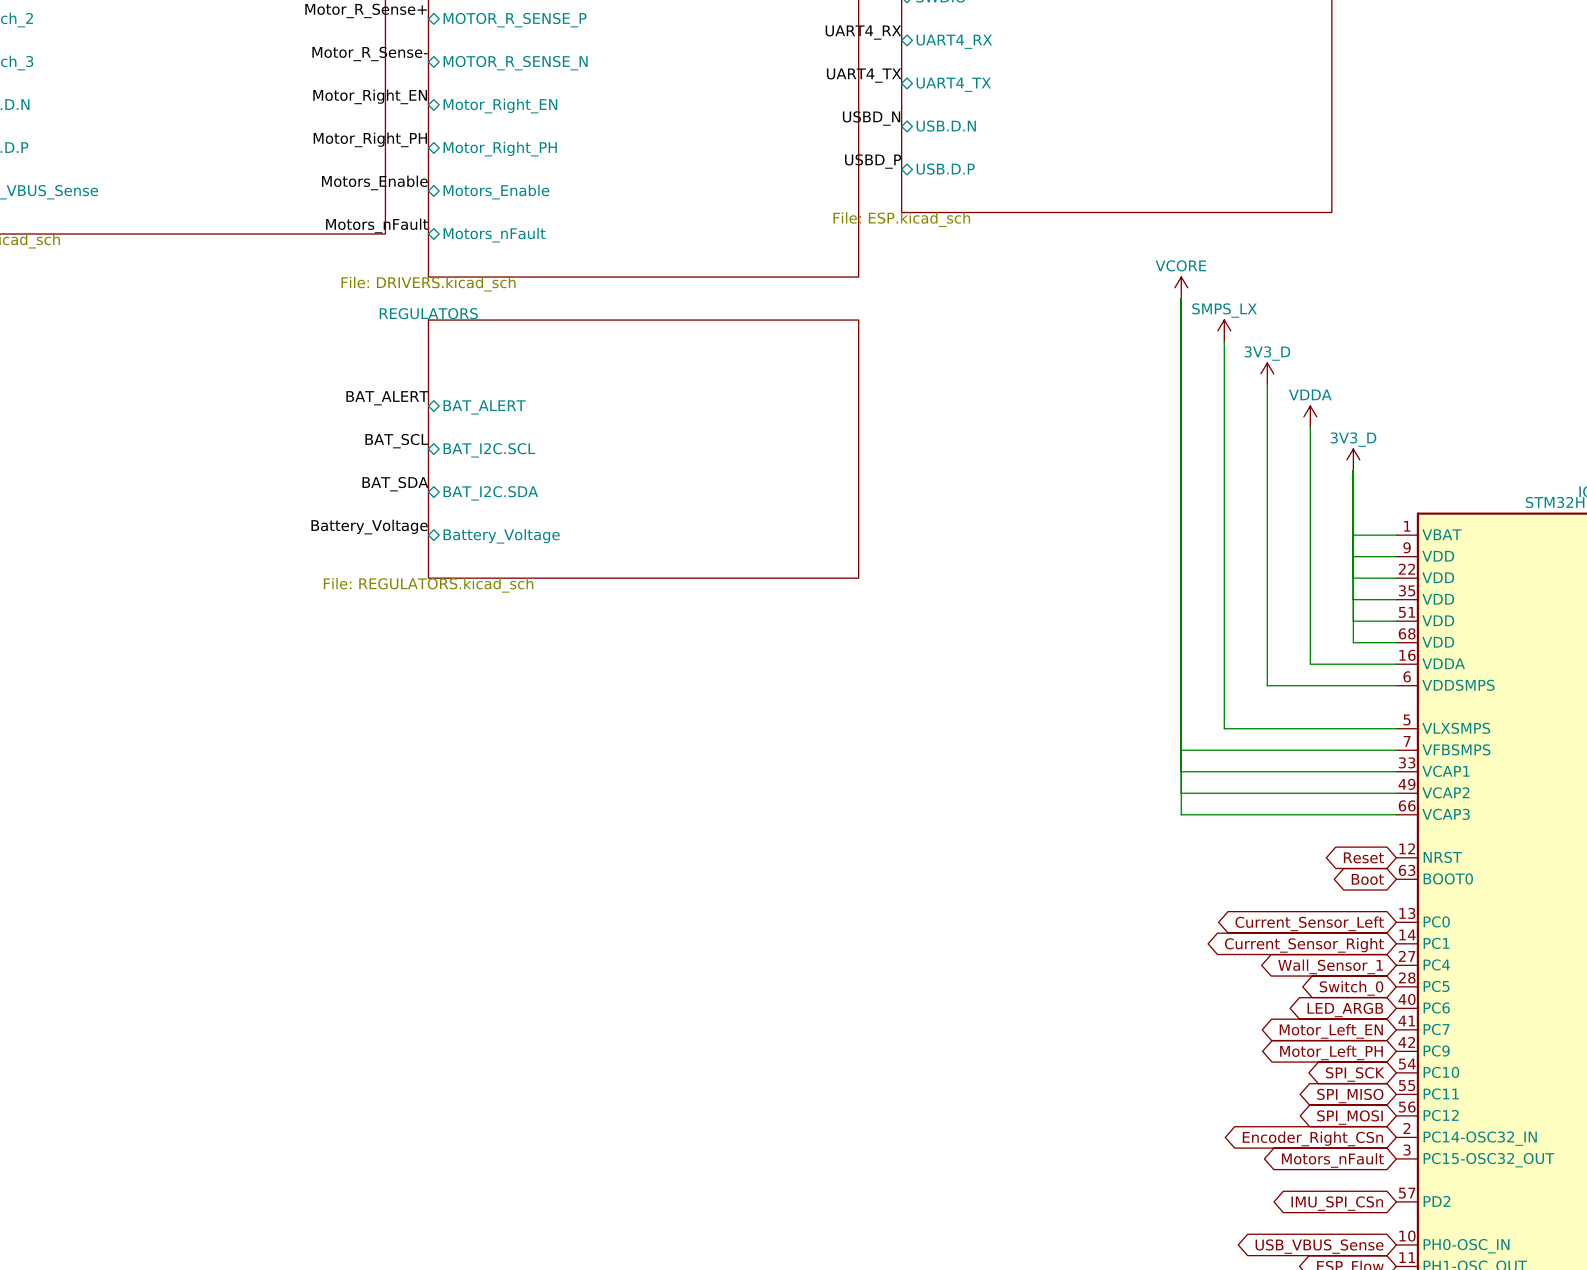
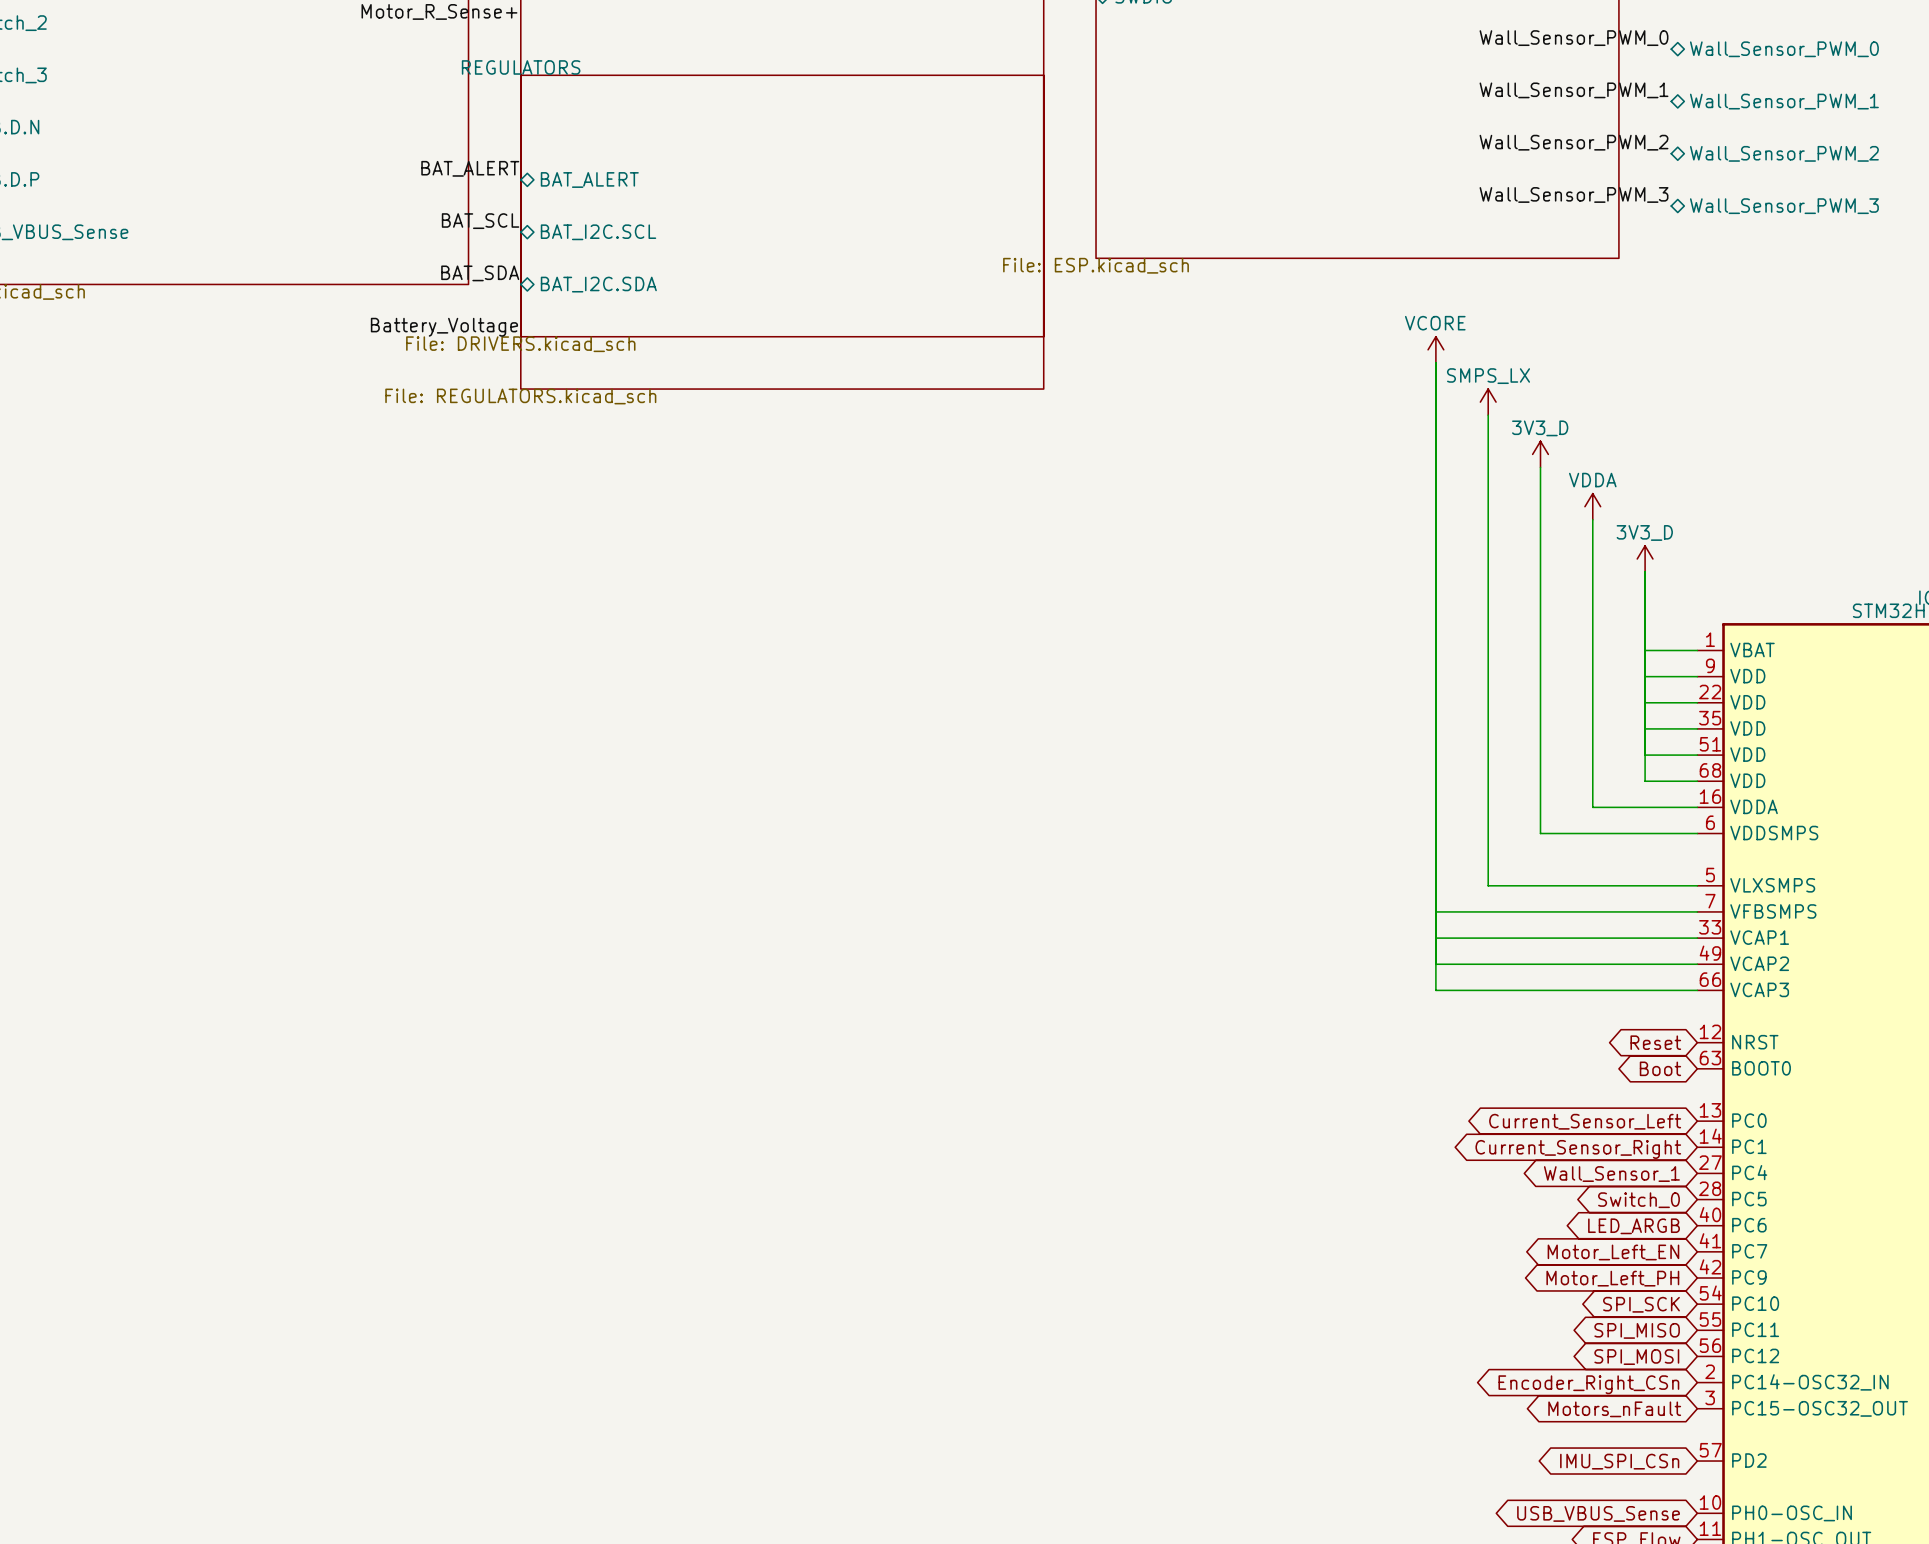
sheet pin: MOTOR_R_SENSE_P (515, 20) -> none
label: UART4_RX (863, 32) -> none
label: none -> Wall_Sensor_PWM_0 (1574, 38)
sheet pin: UART4_RX (954, 41) -> none
sheet pin: none -> Wall_Sensor_PWM_0 (1784, 49)
label: Motor_R_Sense- (370, 53) -> none
sheet pin: MOTOR_R_SENSE_N (515, 63) -> none
label: UART4_TX (864, 75) -> none
label: none -> Wall_Sensor_PWM_1 (1574, 90)
sheet pin: UART4_TX (953, 84) -> none
sheet pin: none -> Wall_Sensor_PWM_1 (1784, 101)
label: Motor_Right_EN (370, 96) -> none
sheet pin: Motor_Right_EN (500, 106) -> none
label: USBD_N (871, 118) -> none
label: none -> Wall_Sensor_PWM_2 (1574, 142)
sheet pin: USB.D.N (946, 126) -> none
sheet pin: none -> Wall_Sensor_PWM_2 (1784, 153)
label: Motor_Right_PH (370, 139) -> BAT_ALERT (470, 168)
sheet pin: Motor_Right_PH (500, 149) -> BAT_ALERT (589, 180)
label: USBD_P (873, 161) -> none
label: none -> Wall_Sensor_PWM_3 (1574, 194)
sheet pin: USB.D.P (945, 169) -> none
sheet pin: none -> Wall_Sensor_PWM_3 (1784, 206)
label: Motors_Enable (374, 182) -> BAT_SCL (480, 221)
sheet REGULATORS: none -> File: REGULATORS.kicad_sch (782, 232)
sheet pin: Motors_Enable (496, 192) -> BAT_I2C.SCL (598, 232)
label: Motors_nFault (377, 225) -> BAT_SDA (480, 273)
sheet pin: Motors_nFault (494, 235) -> BAT_I2C.SDA (598, 284)
label: none -> Battery_Voltage (444, 327)
label: BAT_ALERT (387, 398) -> none
sheet pin: BAT_ALERT (484, 407) -> none
label: BAT_SCL (396, 441) -> none
sheet REGULATORS: File: REGULATORS.kicad_sch (643, 449) -> none
sheet pin: BAT_I2C.SCL (489, 450) -> none
label: BAT_SDA (395, 484) -> none
sheet pin: BAT_I2C.SDA (490, 493) -> none
label: Battery_Voltage (369, 527) -> none
sheet pin: Battery_Voltage (501, 536) -> none

